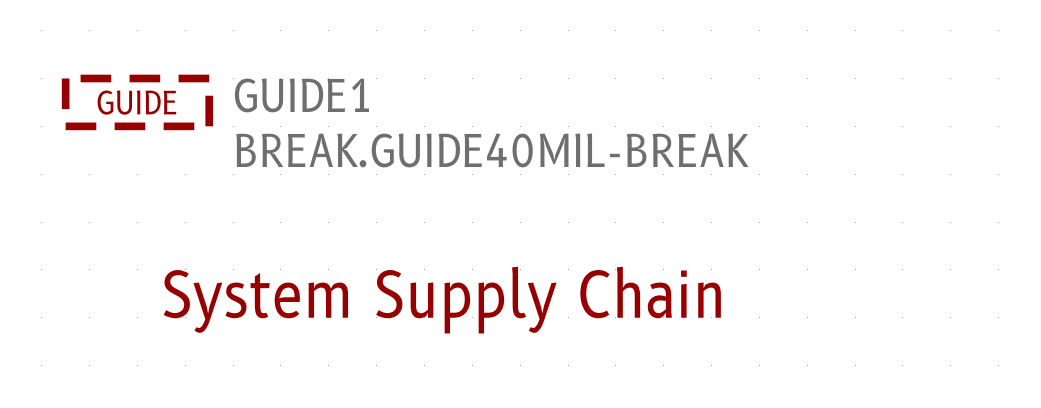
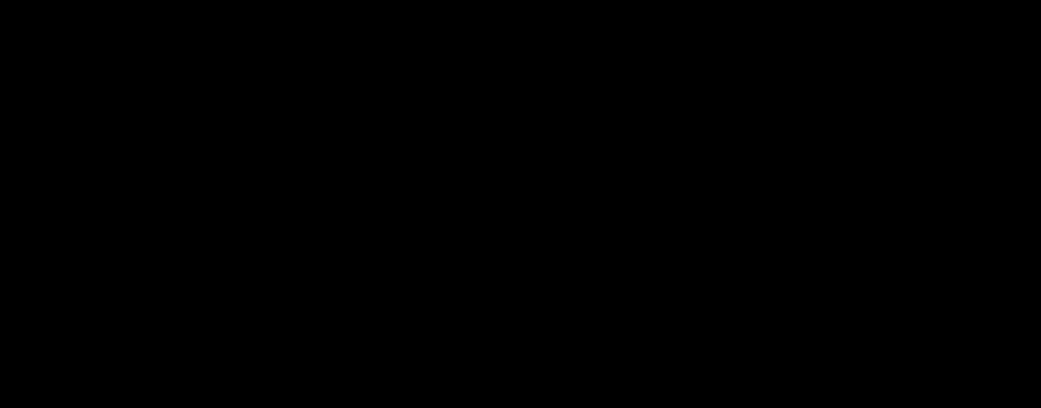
GUIDE1: BREAK.GUIDE40MIL-BREAK (137, 102) -> none
text: System Supply Chain (442, 300) -> none

